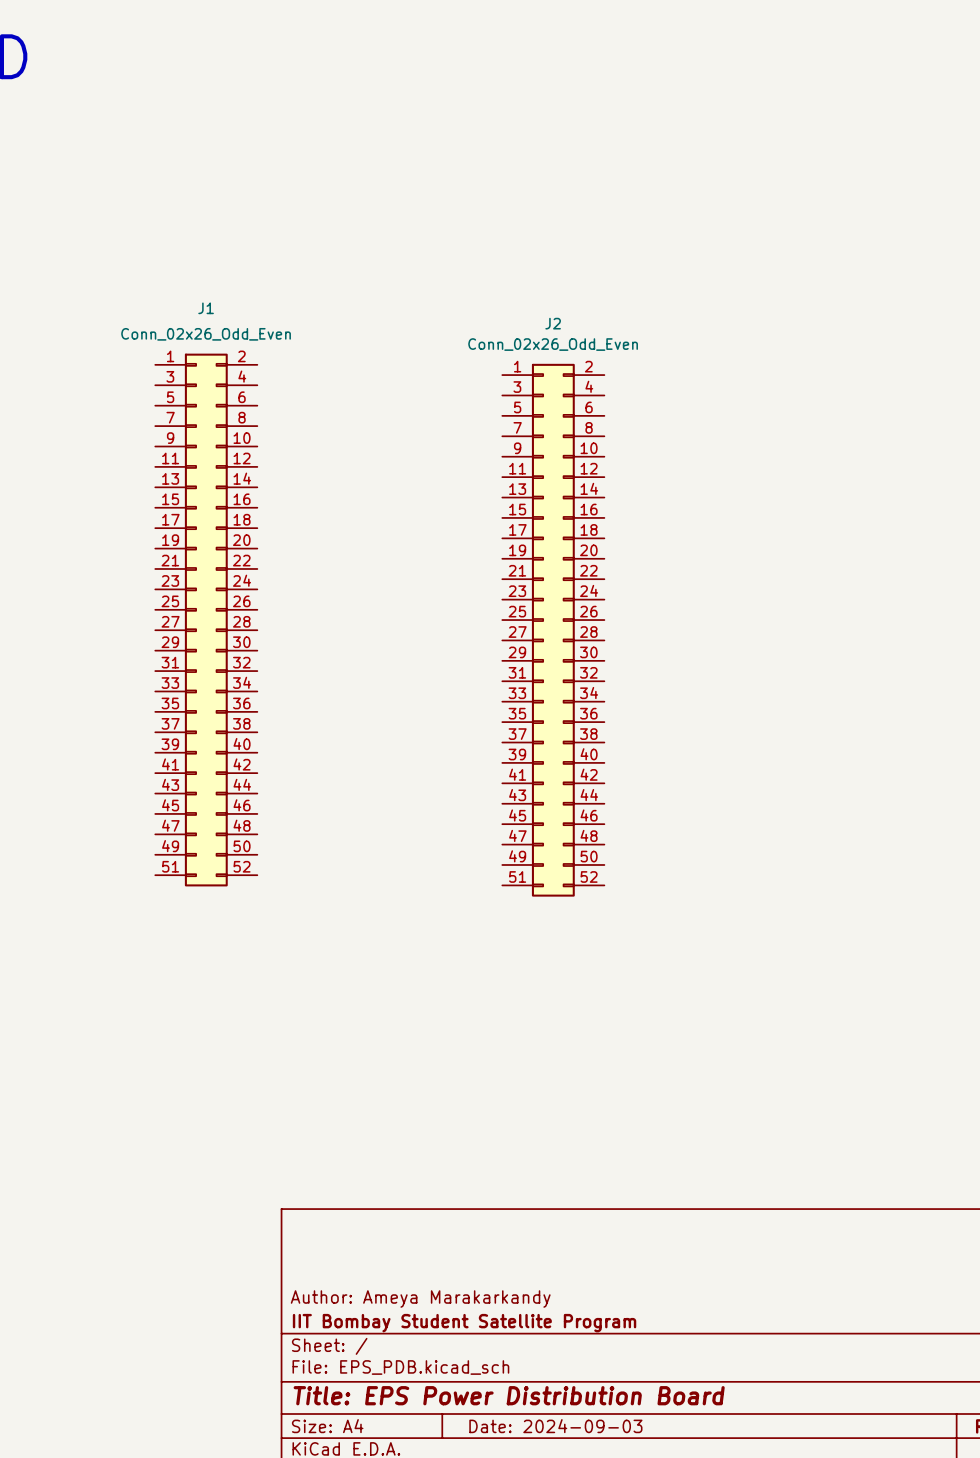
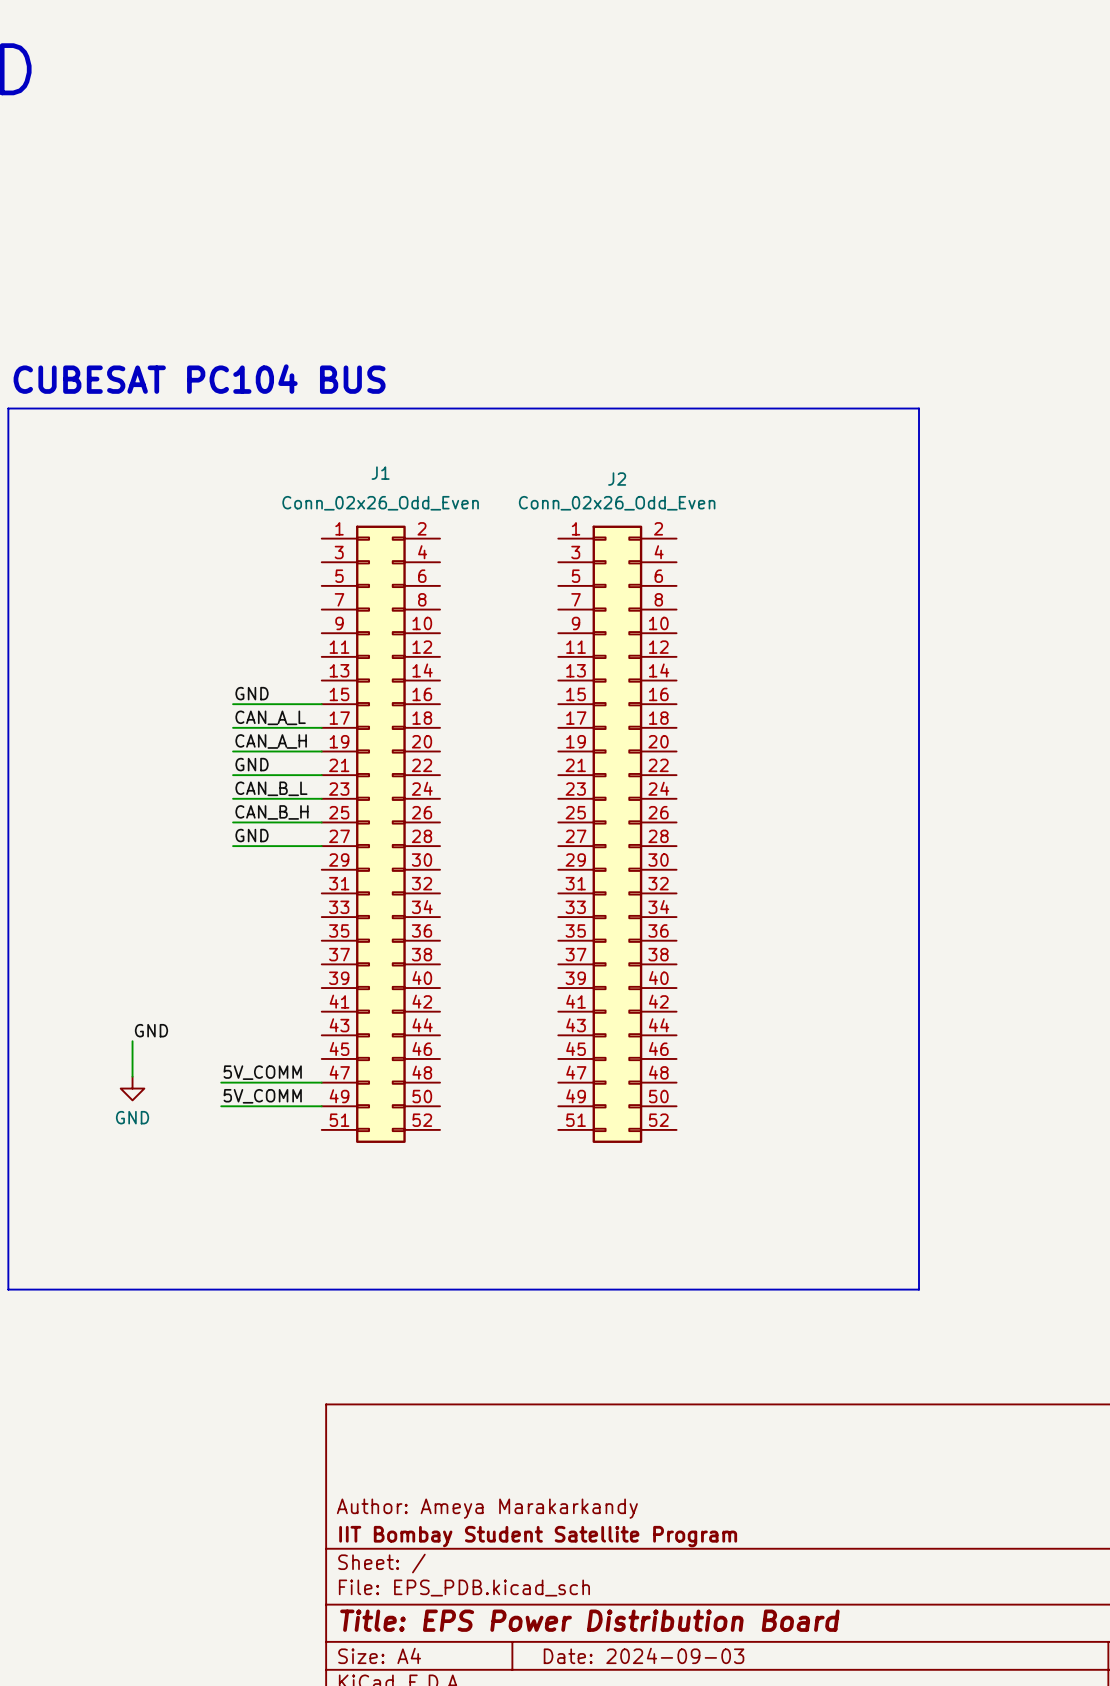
text: none -> CUBESAT PC104 BUS (199, 379)
line: none -> (8, 408) (919, 408) (919, 1289) (8, 1289) (8, 408)
label: none -> GND (252, 693)
wire: none -> (233, 704) (321, 704)
label: none -> CAN_A_L (270, 717)
J1 position: (206, 620) -> (380, 834)
wire: none -> (233, 727) (321, 727)
J2 position: (553, 630) -> (617, 834)
label: none -> CAN_A_H (271, 741)
wire: none -> (233, 751) (321, 751)
label: none -> GND (252, 764)
wire: none -> (233, 775) (321, 775)
label: none -> CAN_B_L (271, 788)
wire: none -> (233, 798) (321, 798)
label: none -> CAN_B_H (272, 812)
wire: none -> (233, 822) (321, 822)
label: none -> GND (252, 835)
wire: none -> (233, 846) (321, 846)
label: none -> GND (151, 1030)
wire: none -> (132, 1041) (132, 1076)
label: none -> 5V_COMM (262, 1072)
wire: none -> (221, 1082) (321, 1082)
power symbol: none -> GND (132, 1088)
label: none -> 5V_COMM (262, 1096)
wire: none -> (221, 1106) (321, 1106)

